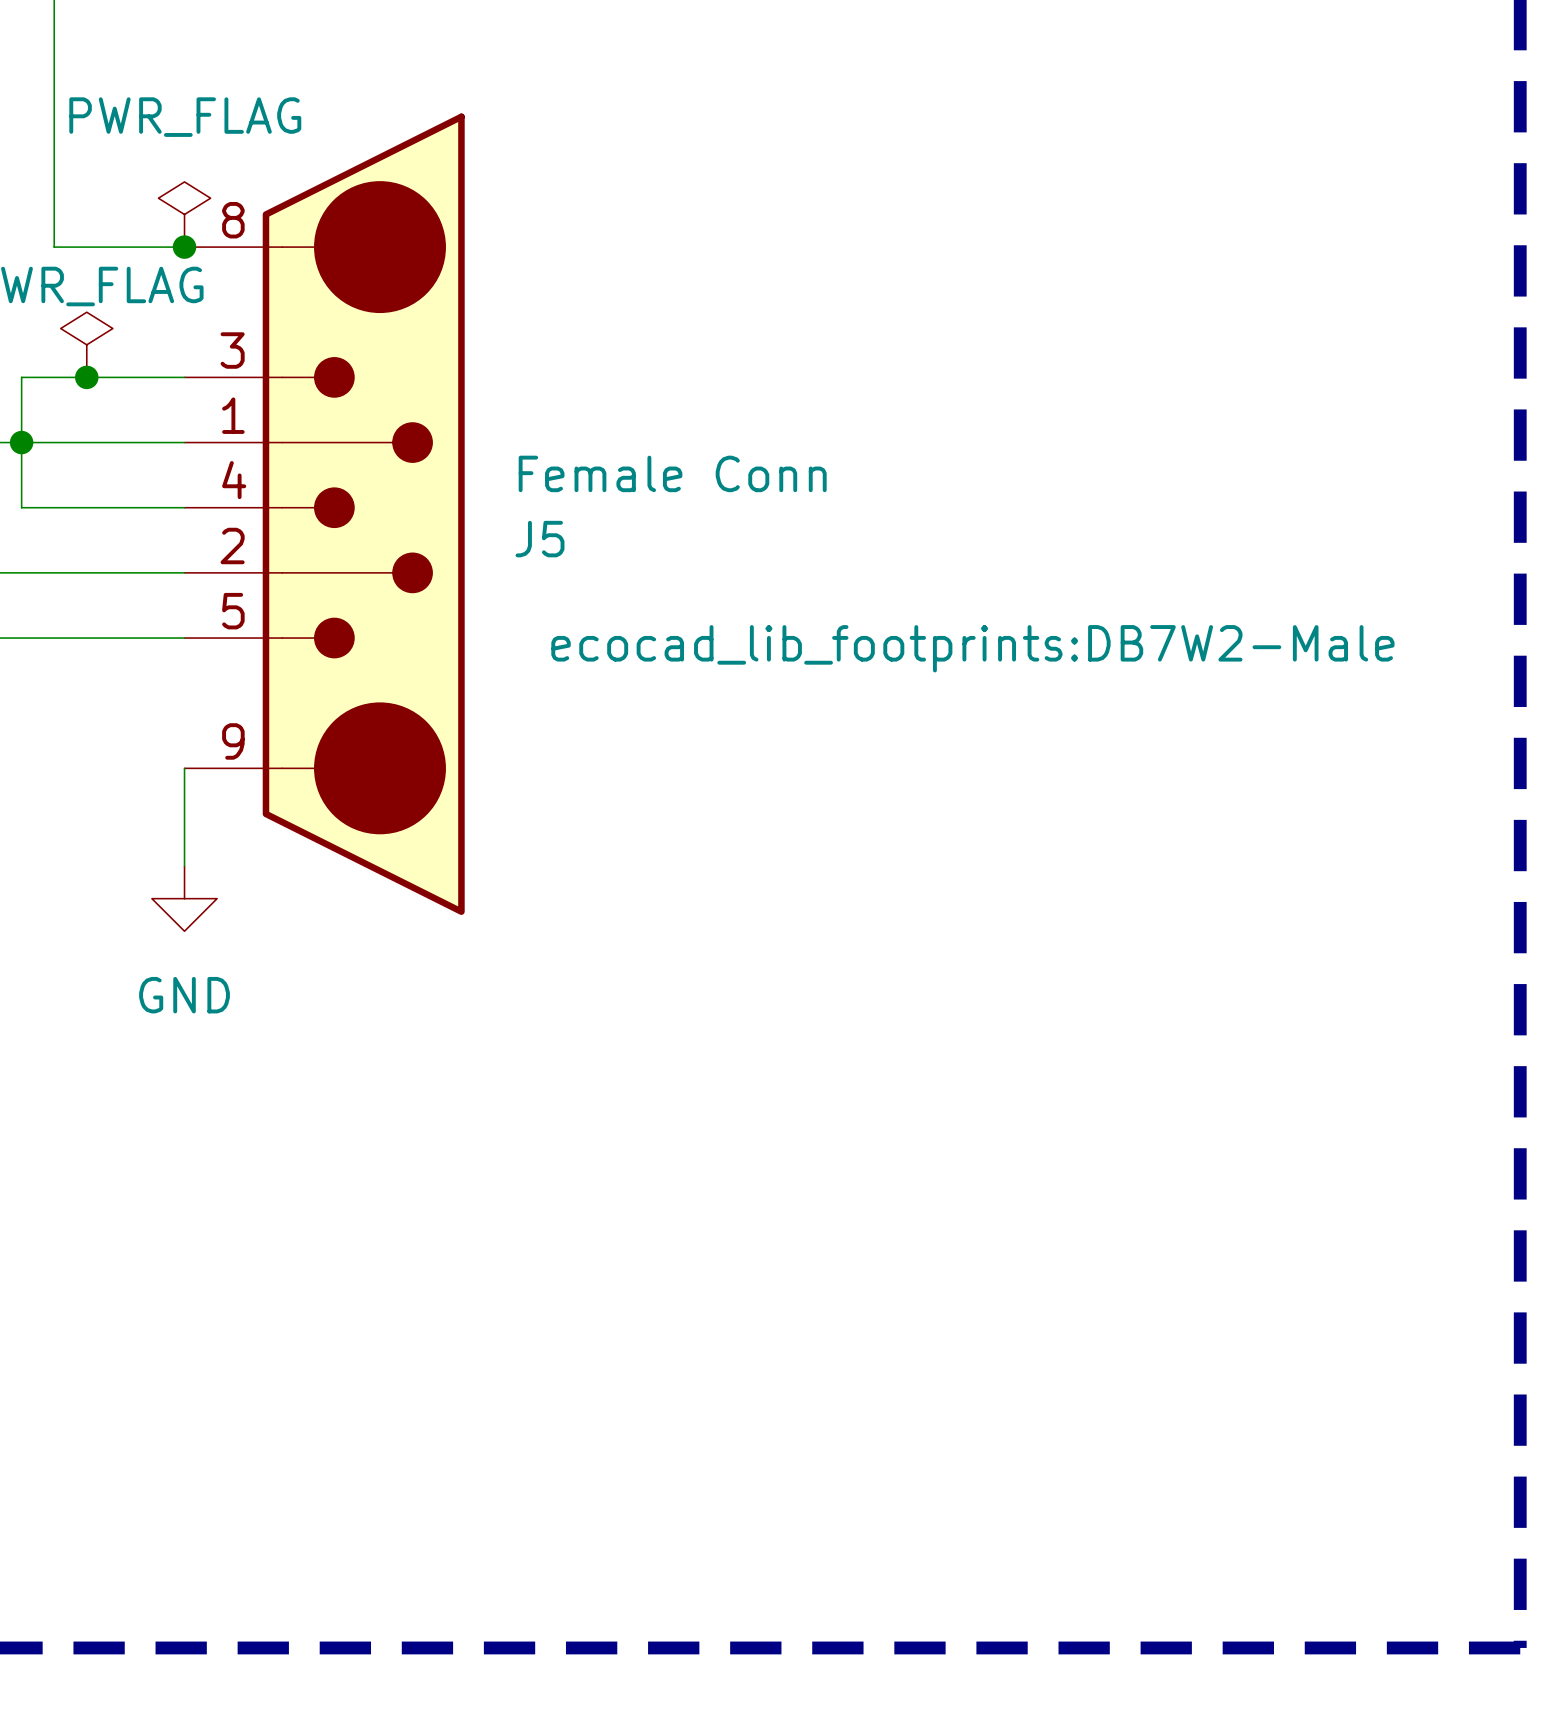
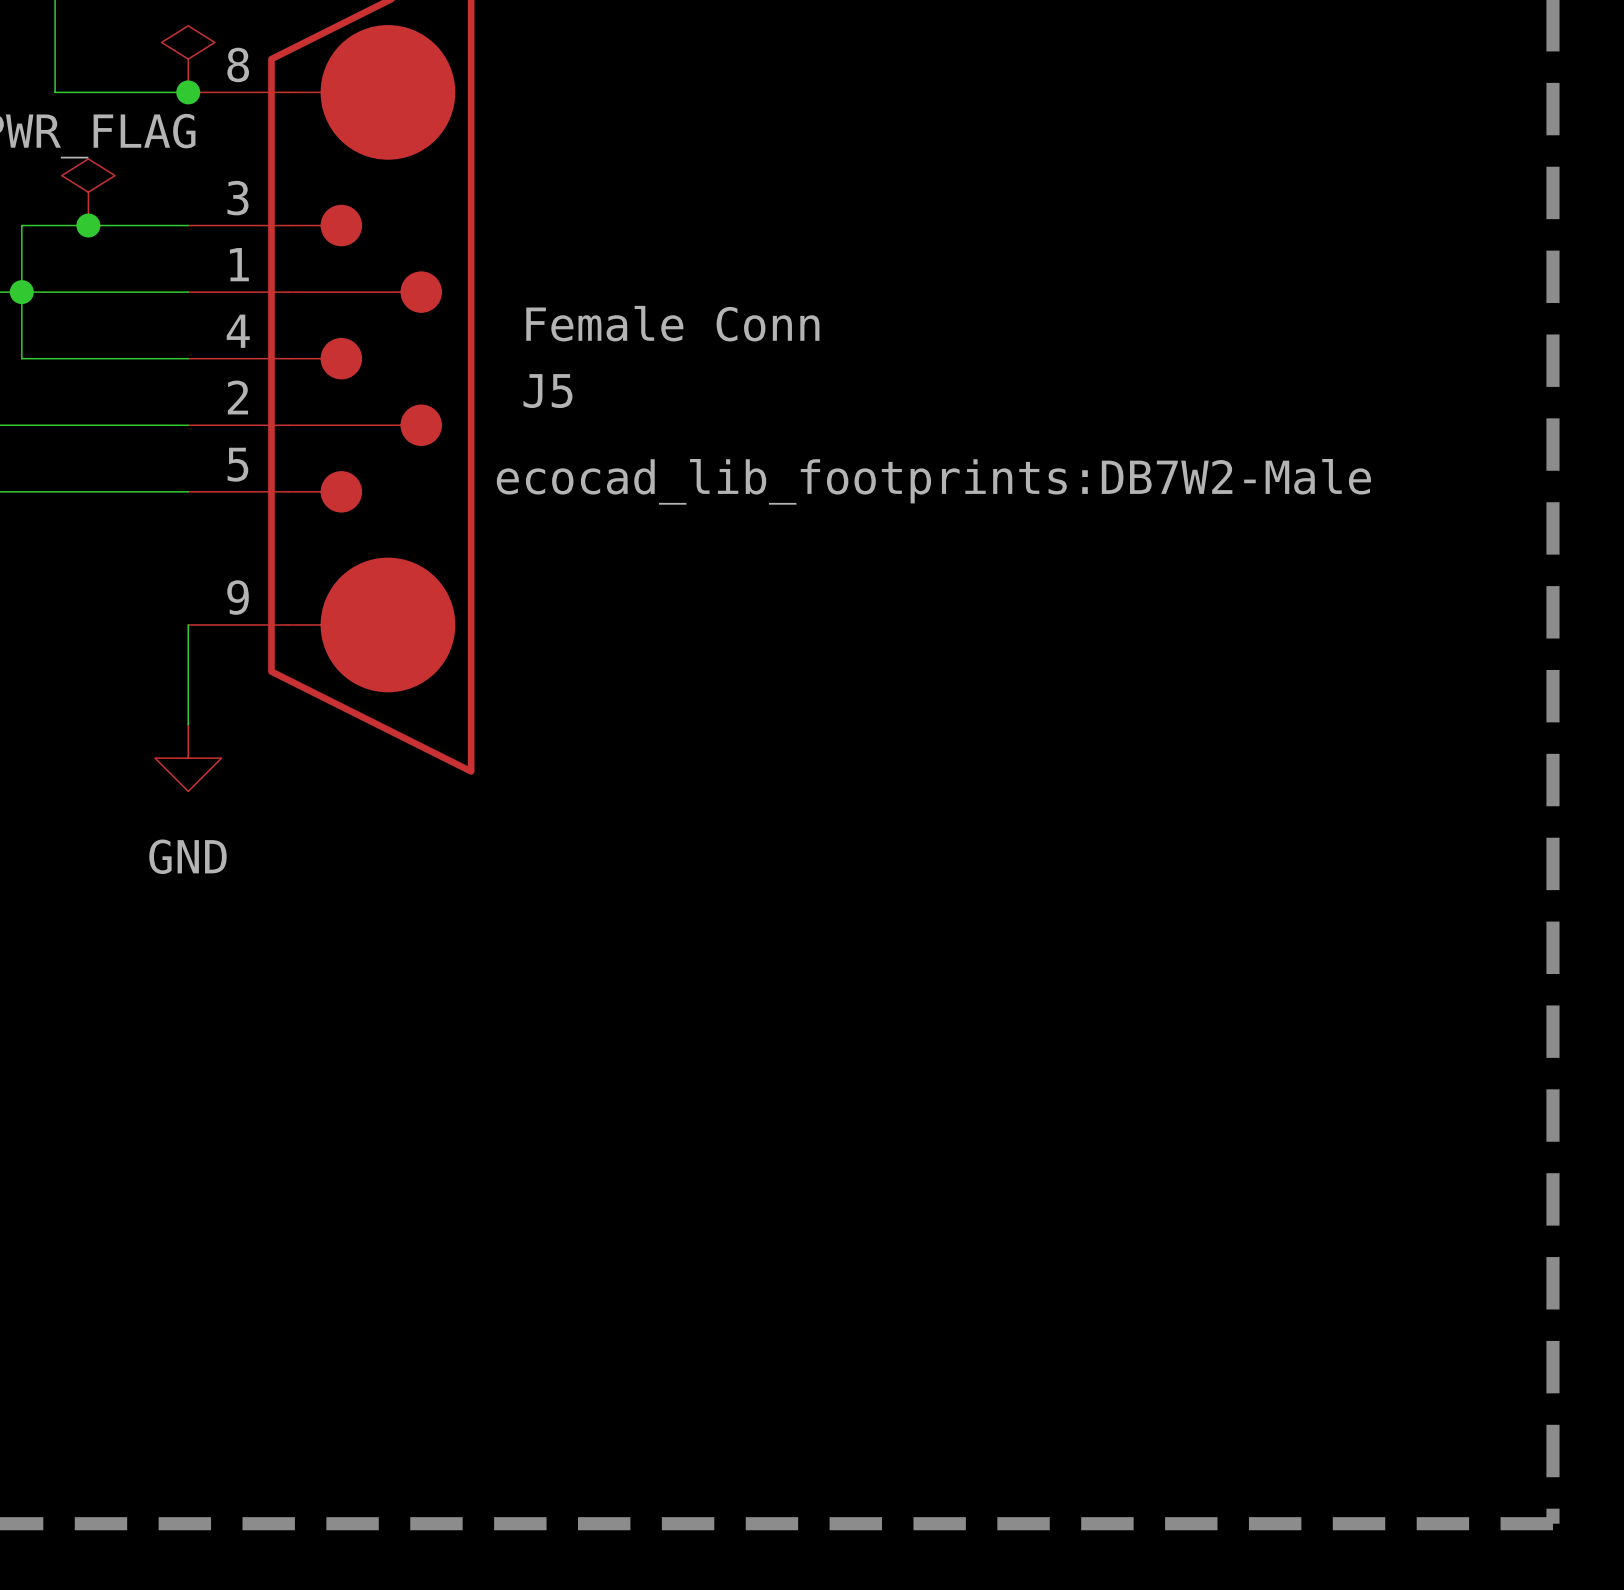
J5 text position: ecocad_lib_footprints:DB7W2-Male (972, 648) -> ecocad_lib_footprints:DB7W2-Male (933, 481)

